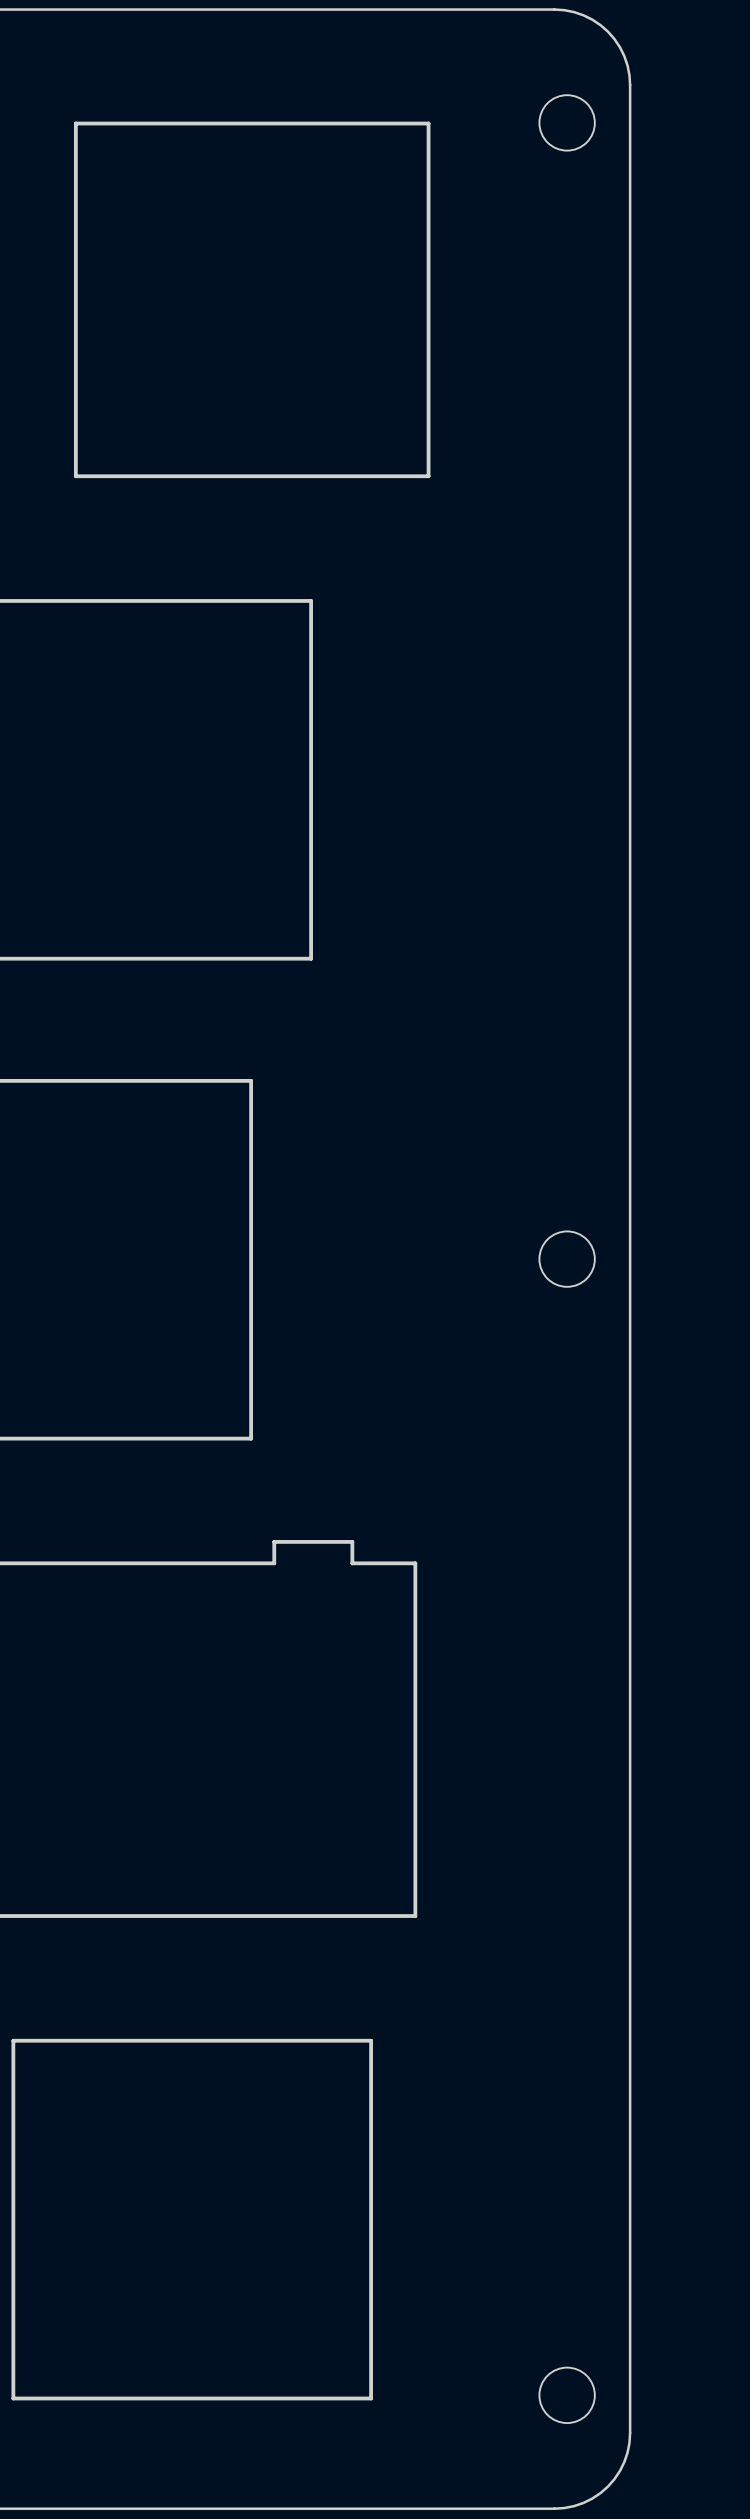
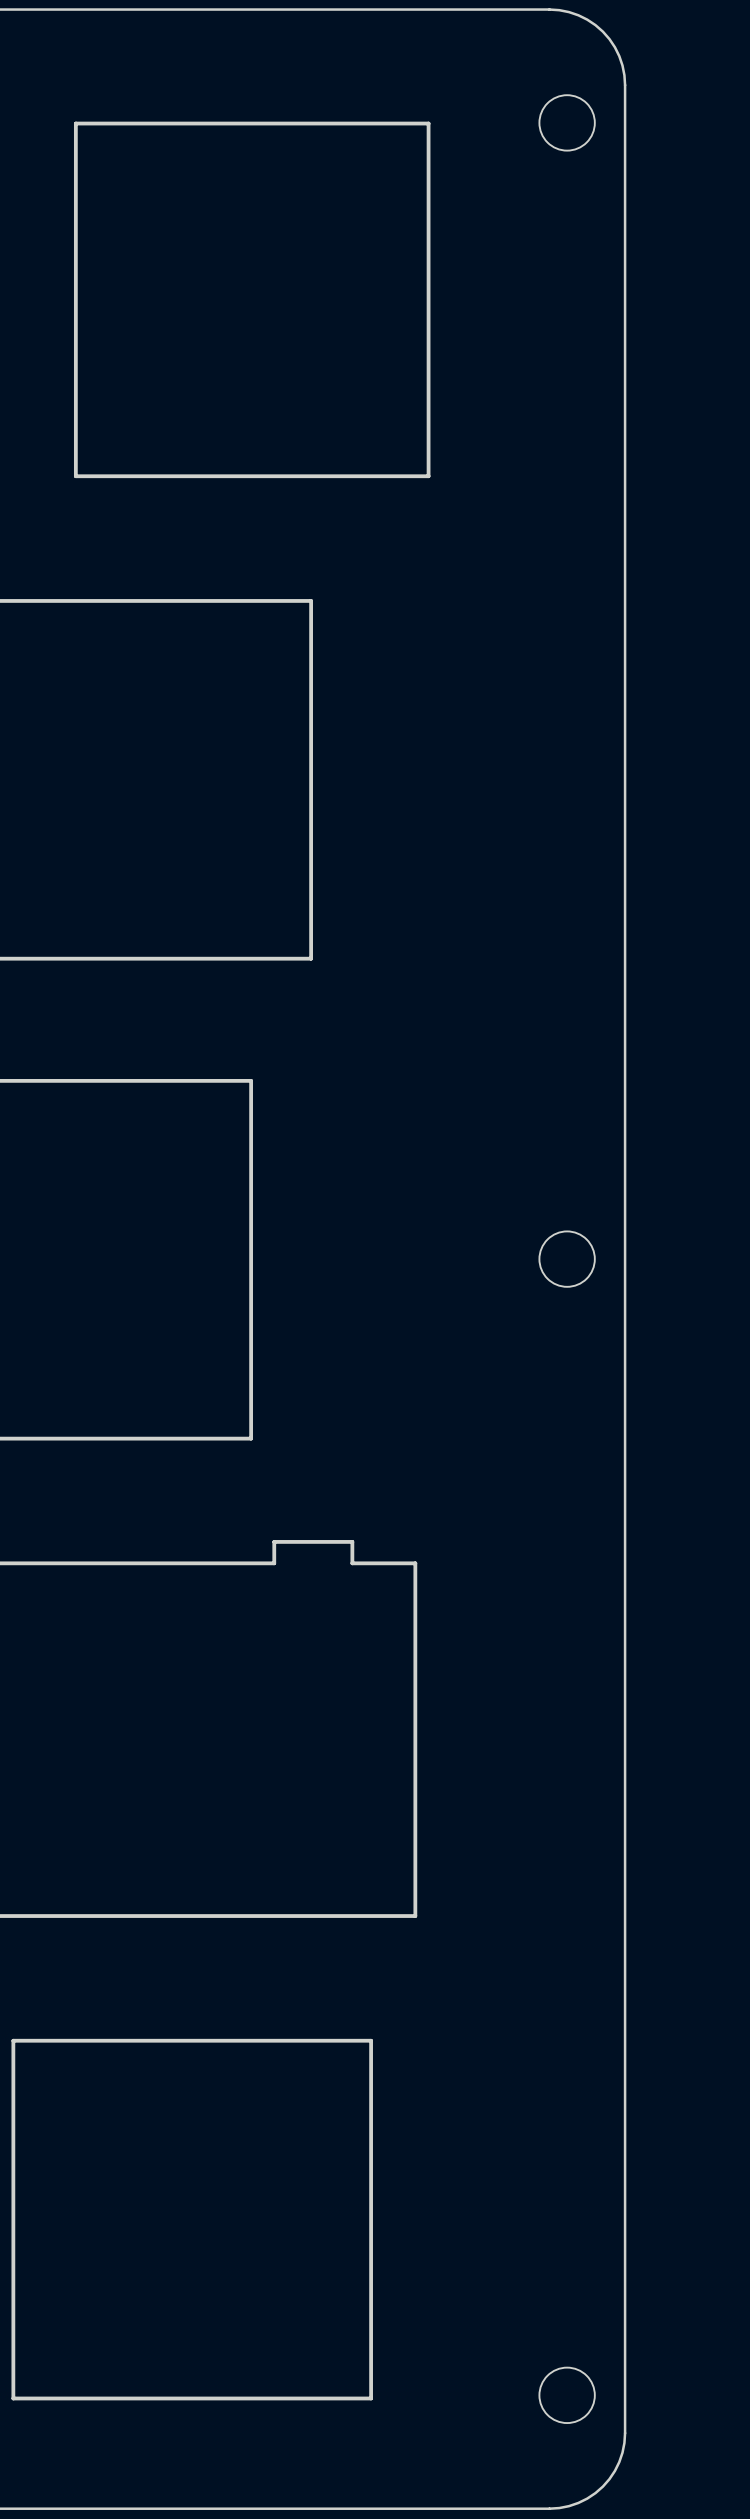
board edge: (549, 9) (564, 10) (583, 15) (607, 31) (624, 56) (630, 85) (630, 2433) (624, 2462) (607, 2486) (583, 2502) (564, 2508) (549, 2508) -> (625, 85) (625, 2433) (619, 2462) (602, 2486) (578, 2502) (549, 2508)
board edge: none -> (549, 9) (578, 15) (602, 31) (619, 56) (625, 85)

